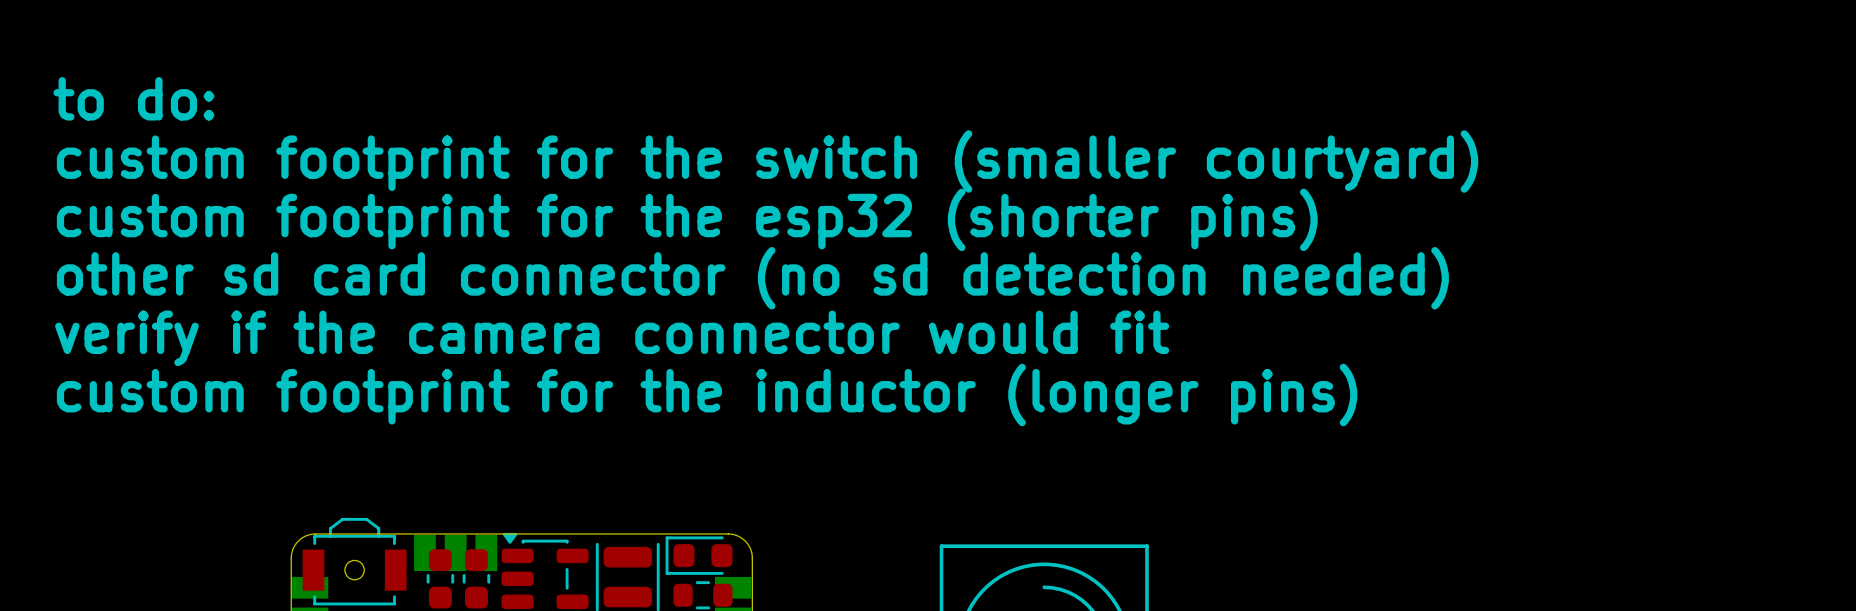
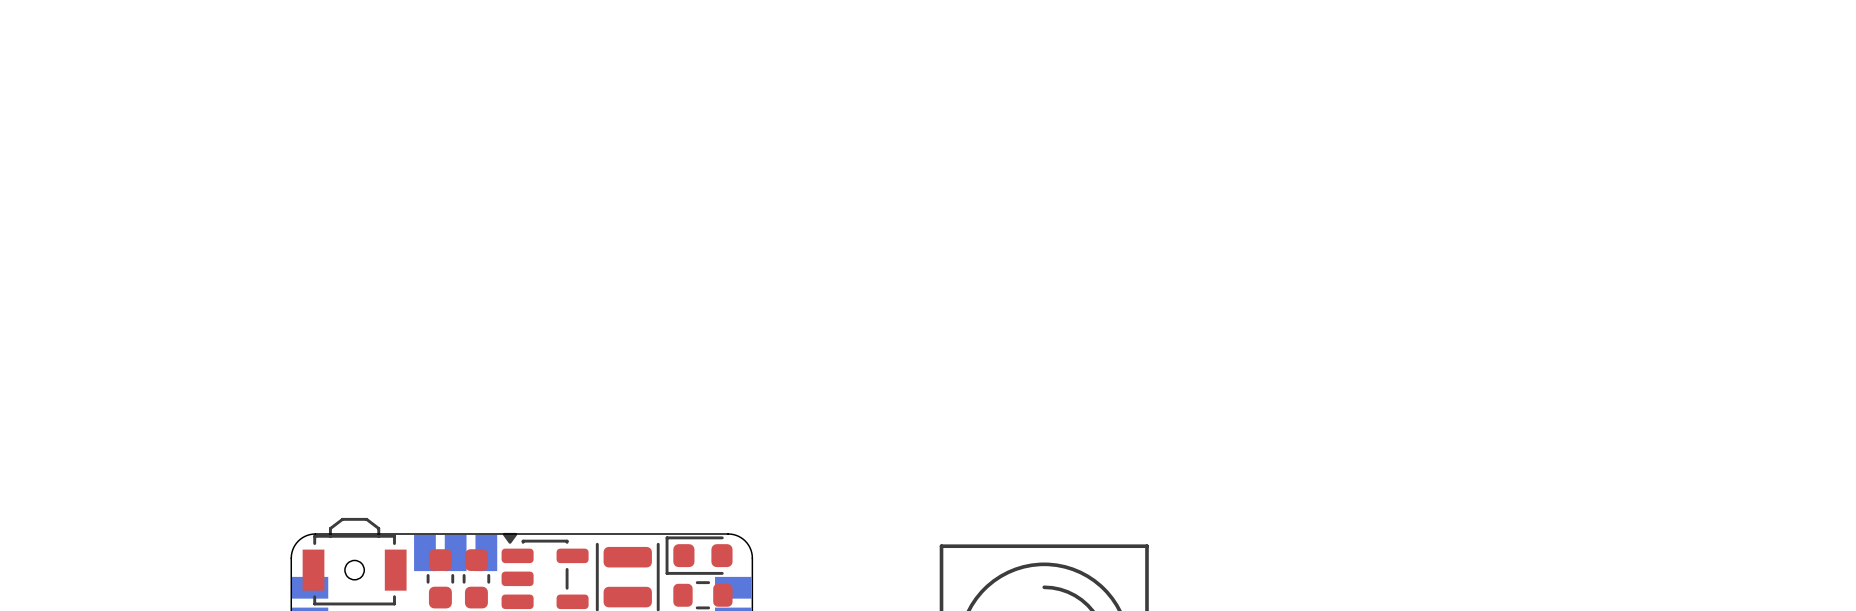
text: to do: (133, 98) -> none
text: custom footprint for the switch (smaller courtyard) (767, 161) -> none
text: custom footprint for the esp32 (shorter pins) (687, 219) -> none
text: other sd card connector (no sd detection needed) (752, 278) -> none
text: verify if the camera connector would fit (612, 338) -> none
text: custom footprint for the inductor (longer pins) (707, 395) -> none

